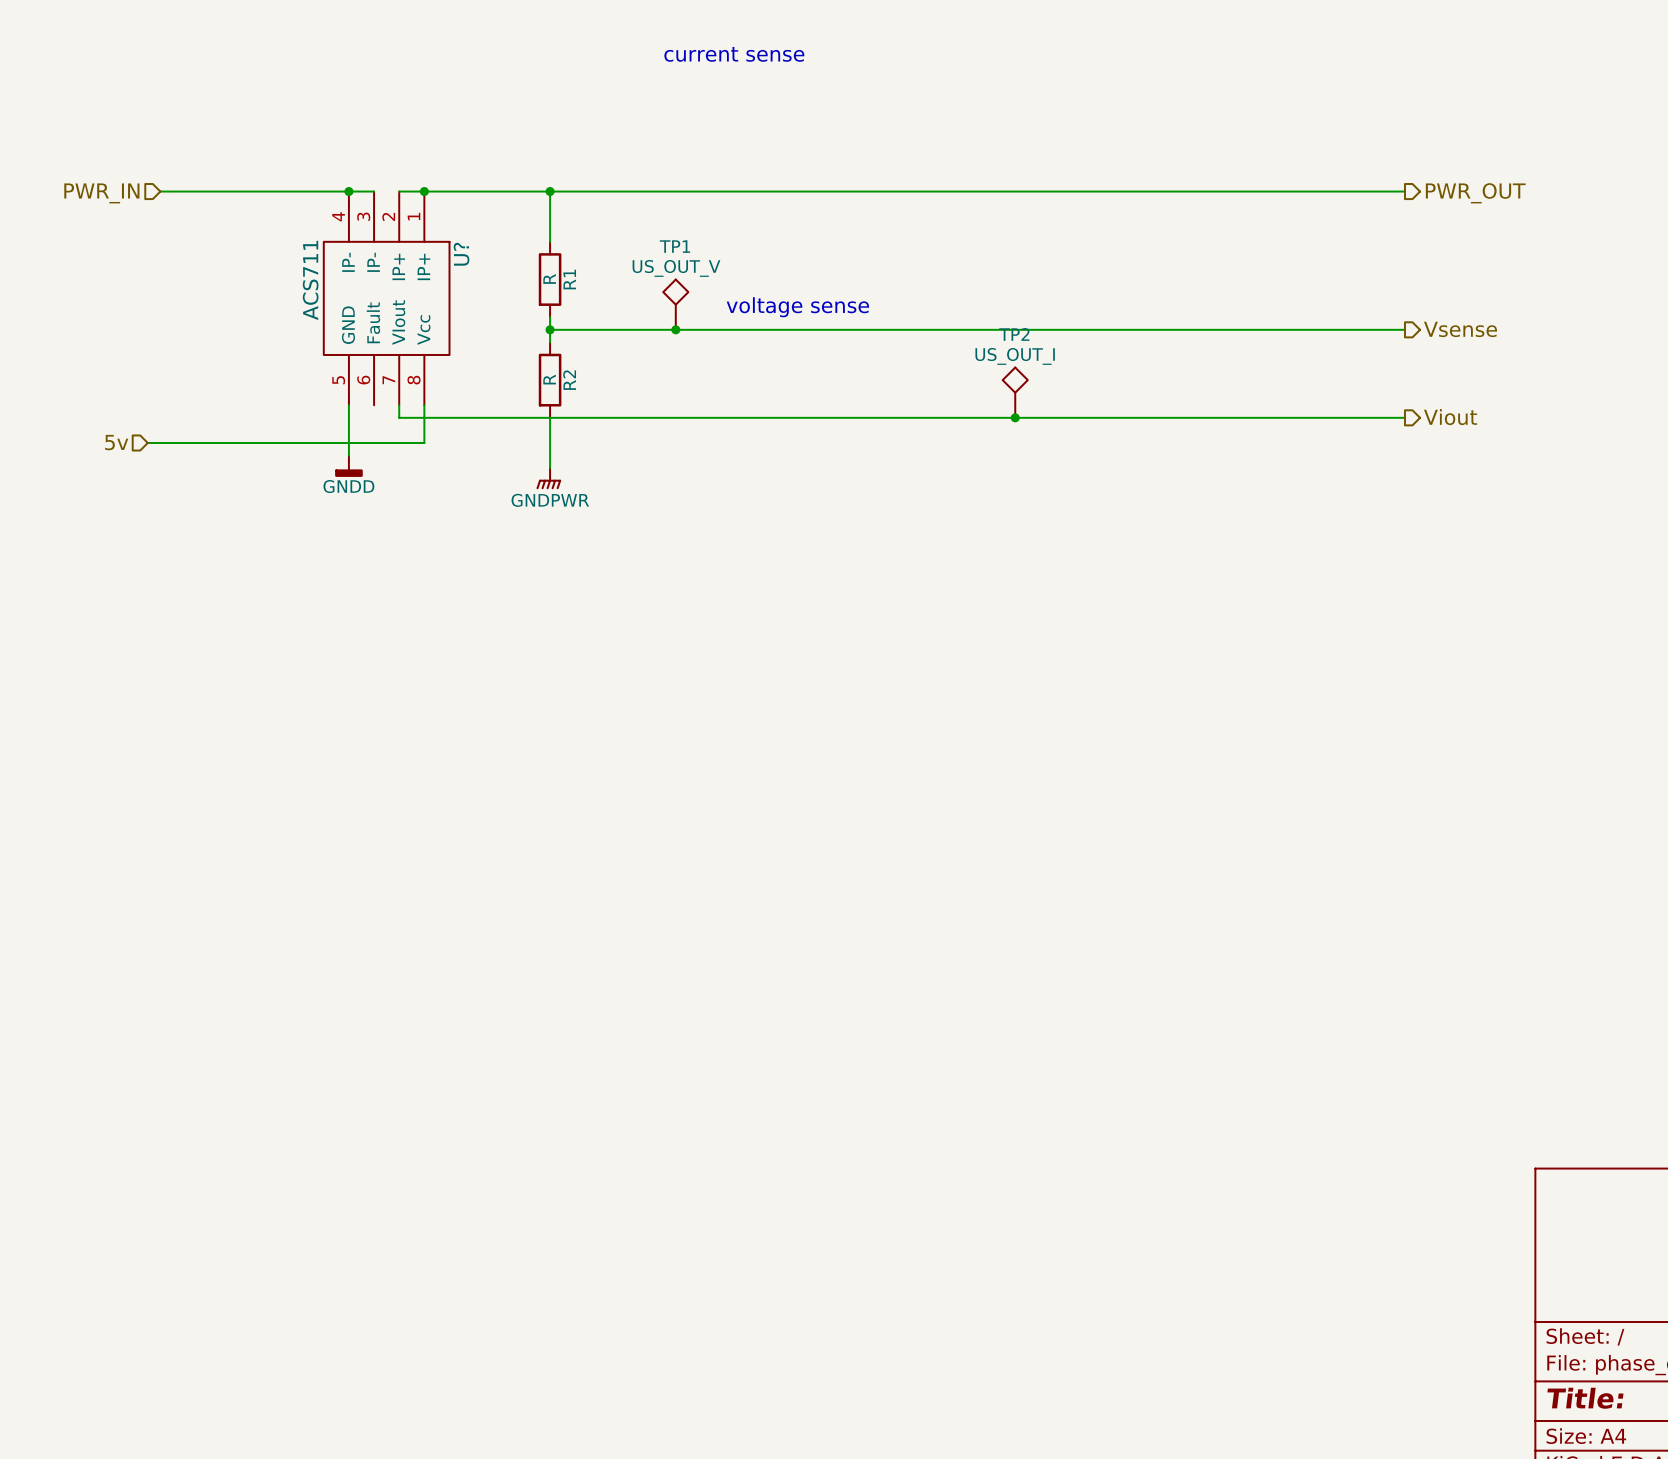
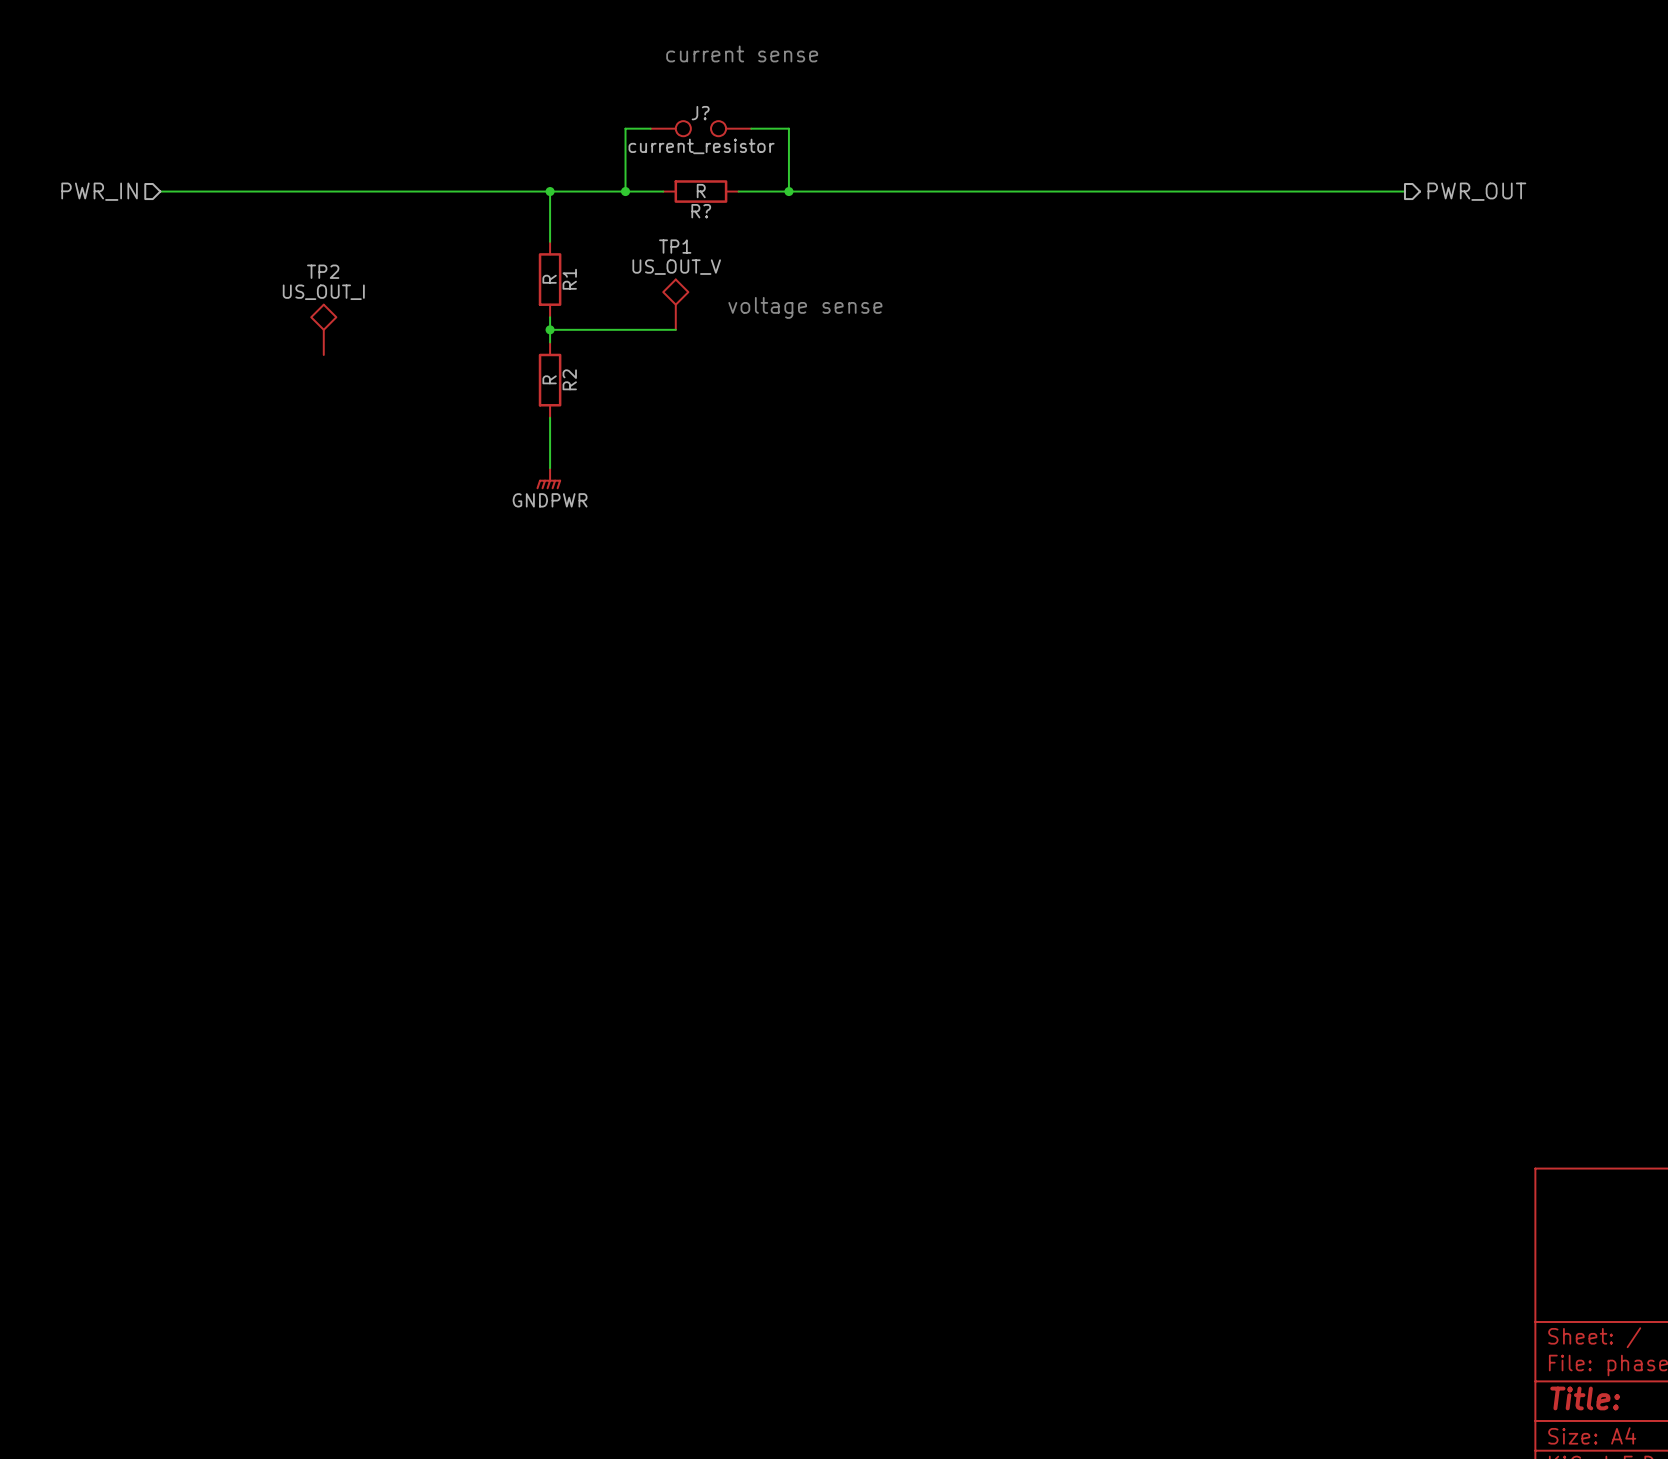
wire: none -> (650, 128) (625, 128) (625, 191)
J?: none -> current_resistor (700, 128)
wire: none -> (751, 128) (788, 128) (788, 191)
junction: (348, 191) -> none
wire: none -> (374, 191) (399, 191)
junction: (424, 191) -> none
junction: none -> (625, 191)
wire: (663, 191) (738, 191) -> none
R?: none -> R (700, 191)
junction: none -> (788, 191)
U?: ACS711 (386, 298) -> none
wire: (675, 329) (1404, 329) -> none
junction: (675, 329) -> none
hierarchical label: Vsense (1460, 329) -> none
TP2 position: (1015, 392) -> (323, 329)
wire: (348, 405) (348, 455) -> none
wire: (399, 405) (399, 417) (1404, 417) -> none
wire: (424, 405) (424, 442) (147, 442) -> none
junction: (1015, 417) -> none
hierarchical label: Viout (1450, 417) -> none
hierarchical label: 5v (116, 442) -> none
power symbol: GNDD (348, 466) -> none

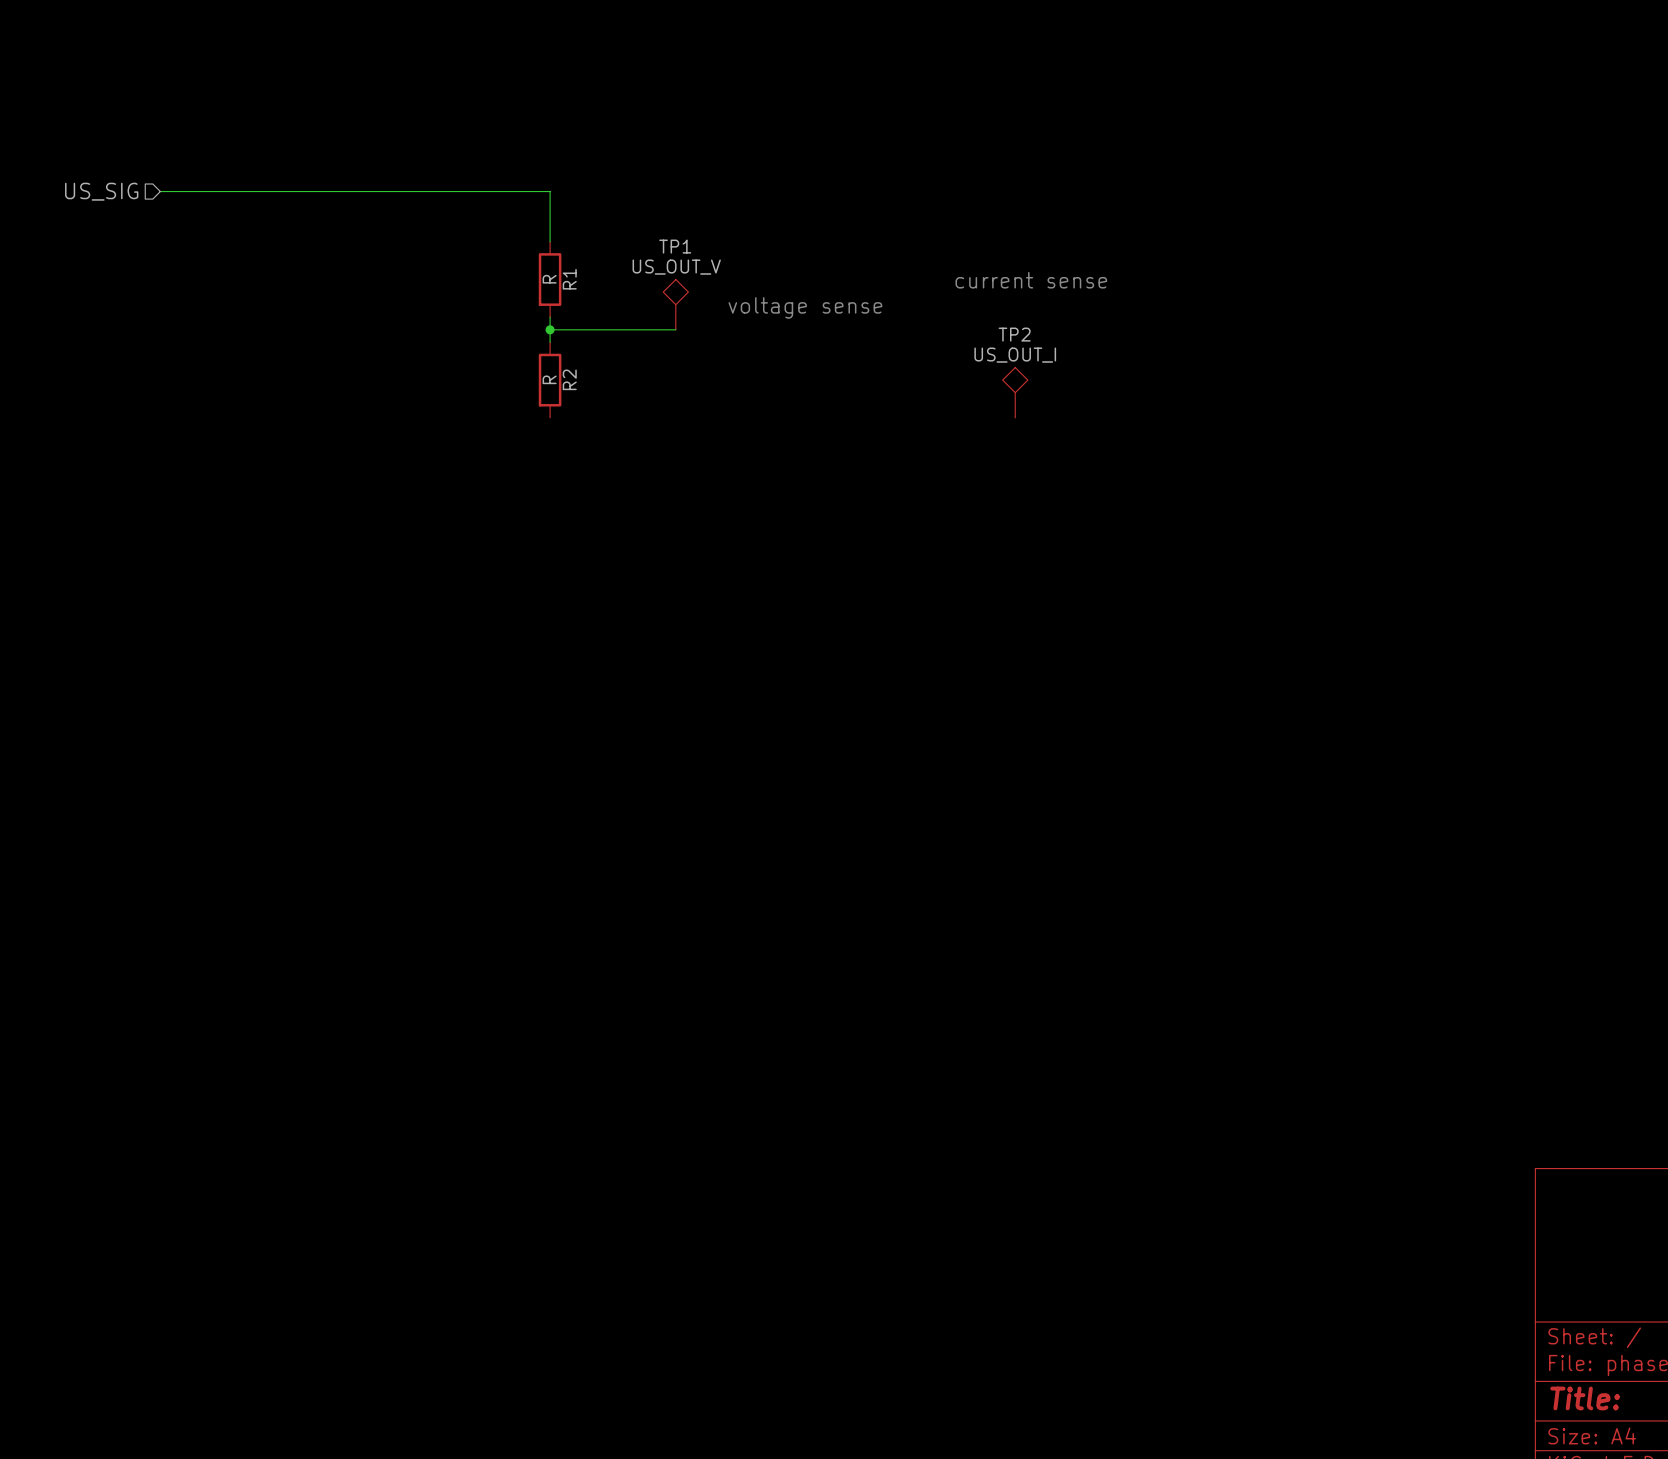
text: current sense (742, 53) -> none
wire: (650, 128) (625, 128) (625, 191) -> none
J?: current_resistor (700, 128) -> none
wire: (751, 128) (788, 128) (788, 191) -> none
hierarchical label: PWR_IN (99, 191) -> US_SIG (101, 191)
wire: (550, 191) (663, 191) -> none
junction: (550, 191) -> none
junction: (625, 191) -> none
R?: R (700, 191) -> none
wire: (738, 191) (1404, 191) -> none
junction: (788, 191) -> none
hierarchical label: PWR_OUT (1476, 191) -> none
text: none -> current sense (1031, 280)
TP2 position: (323, 329) -> (1015, 392)
wire: (550, 417) (550, 468) -> none
power symbol: GNDPWR (548, 478) -> none

